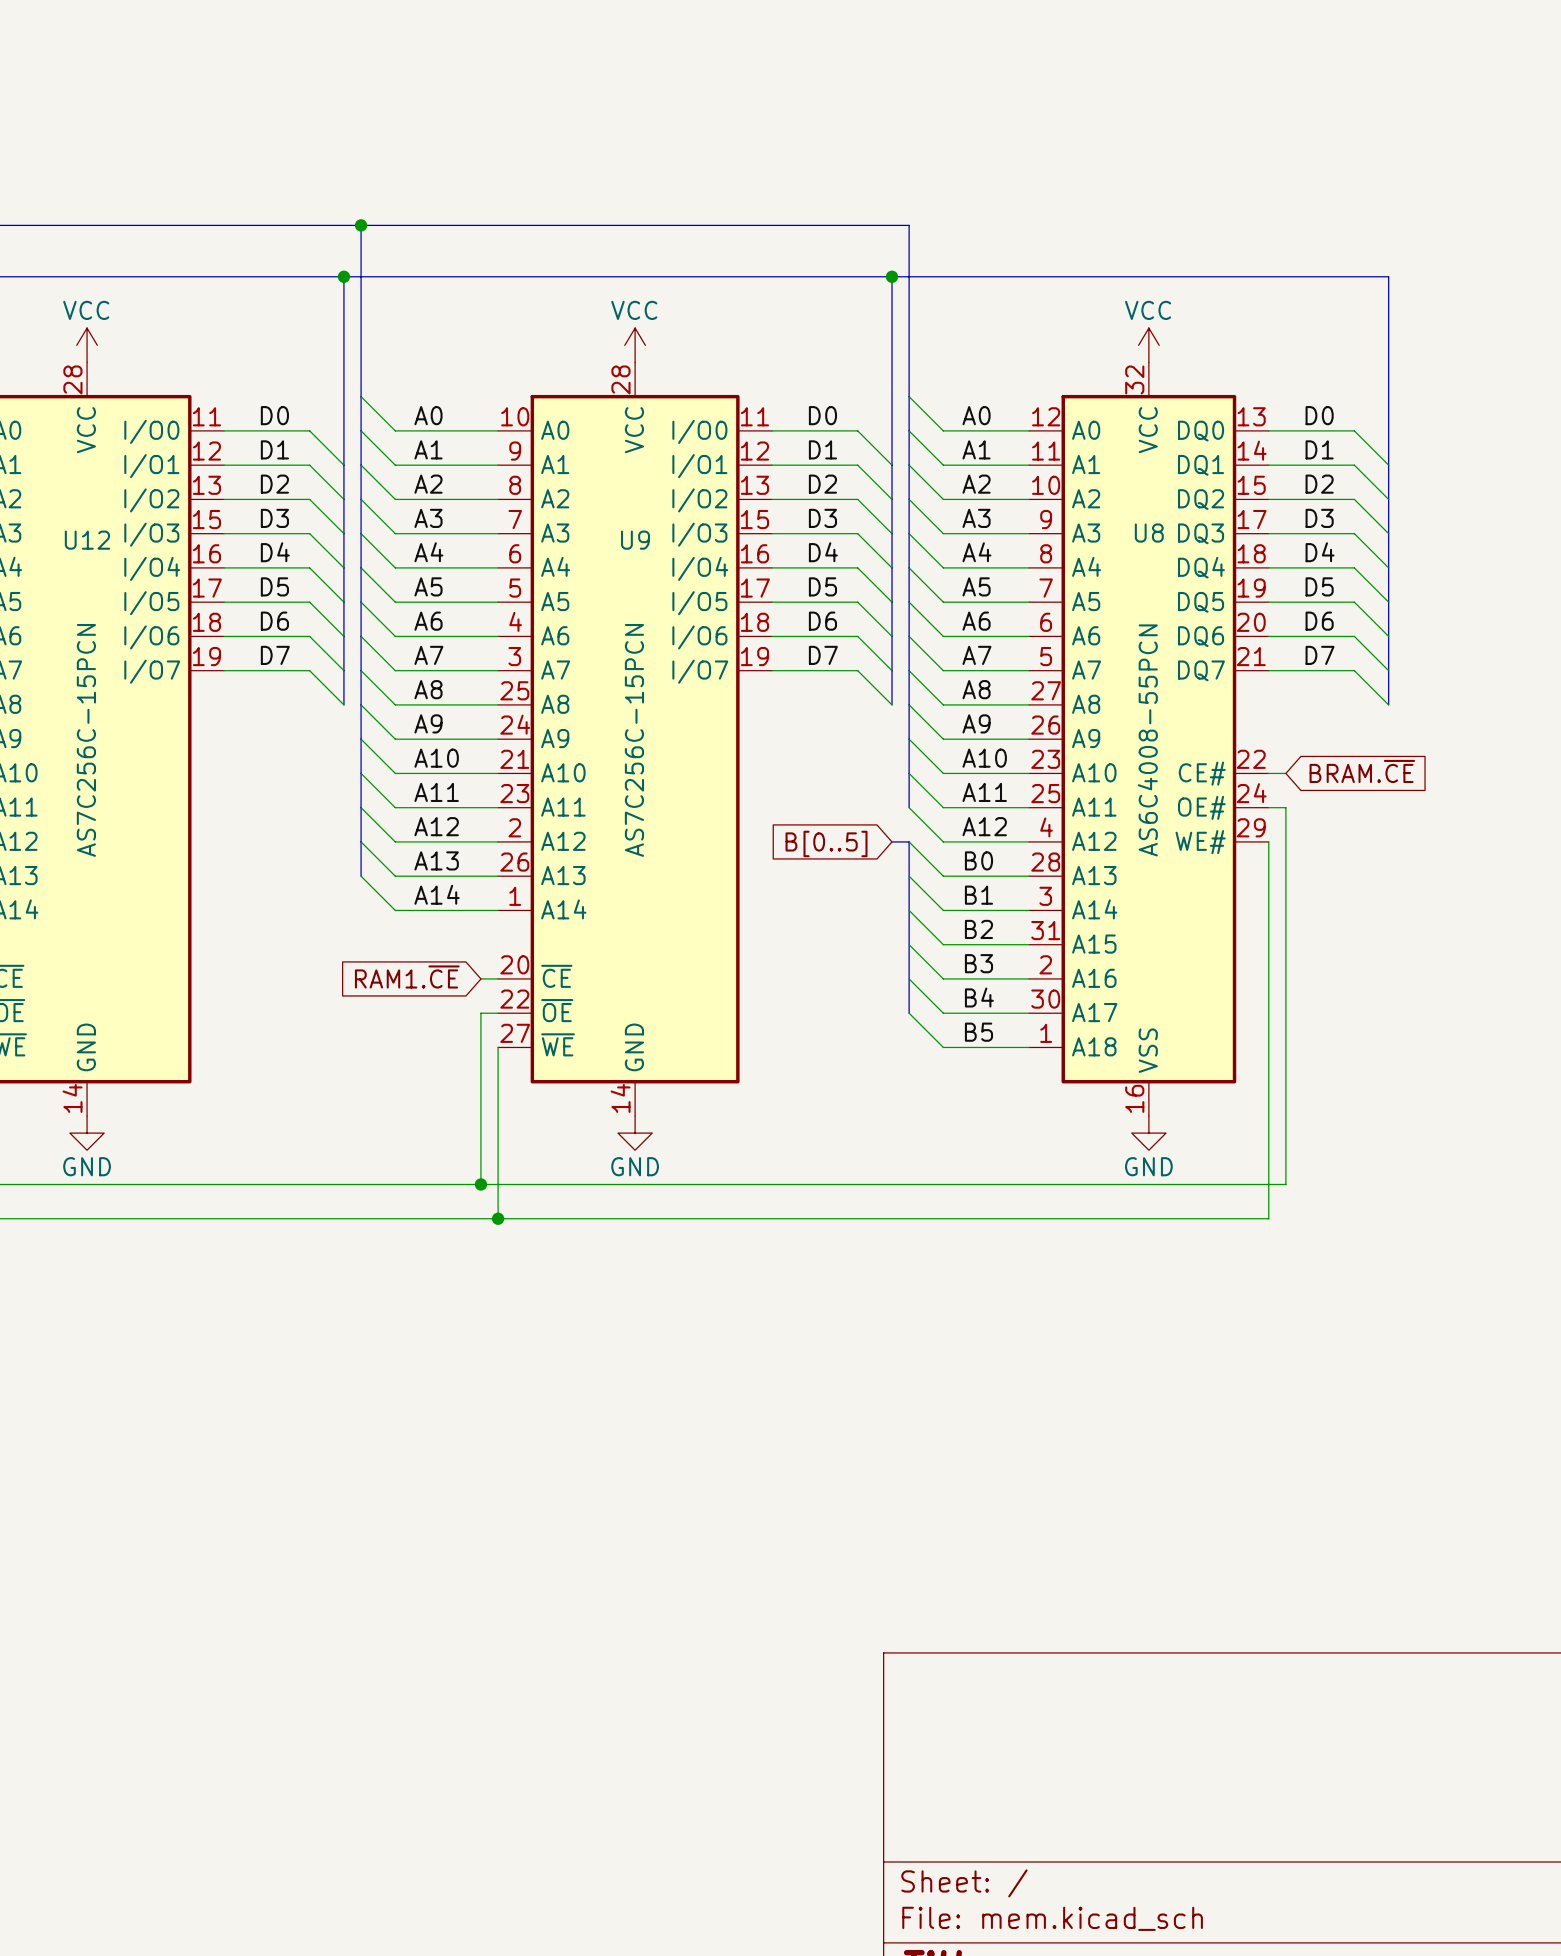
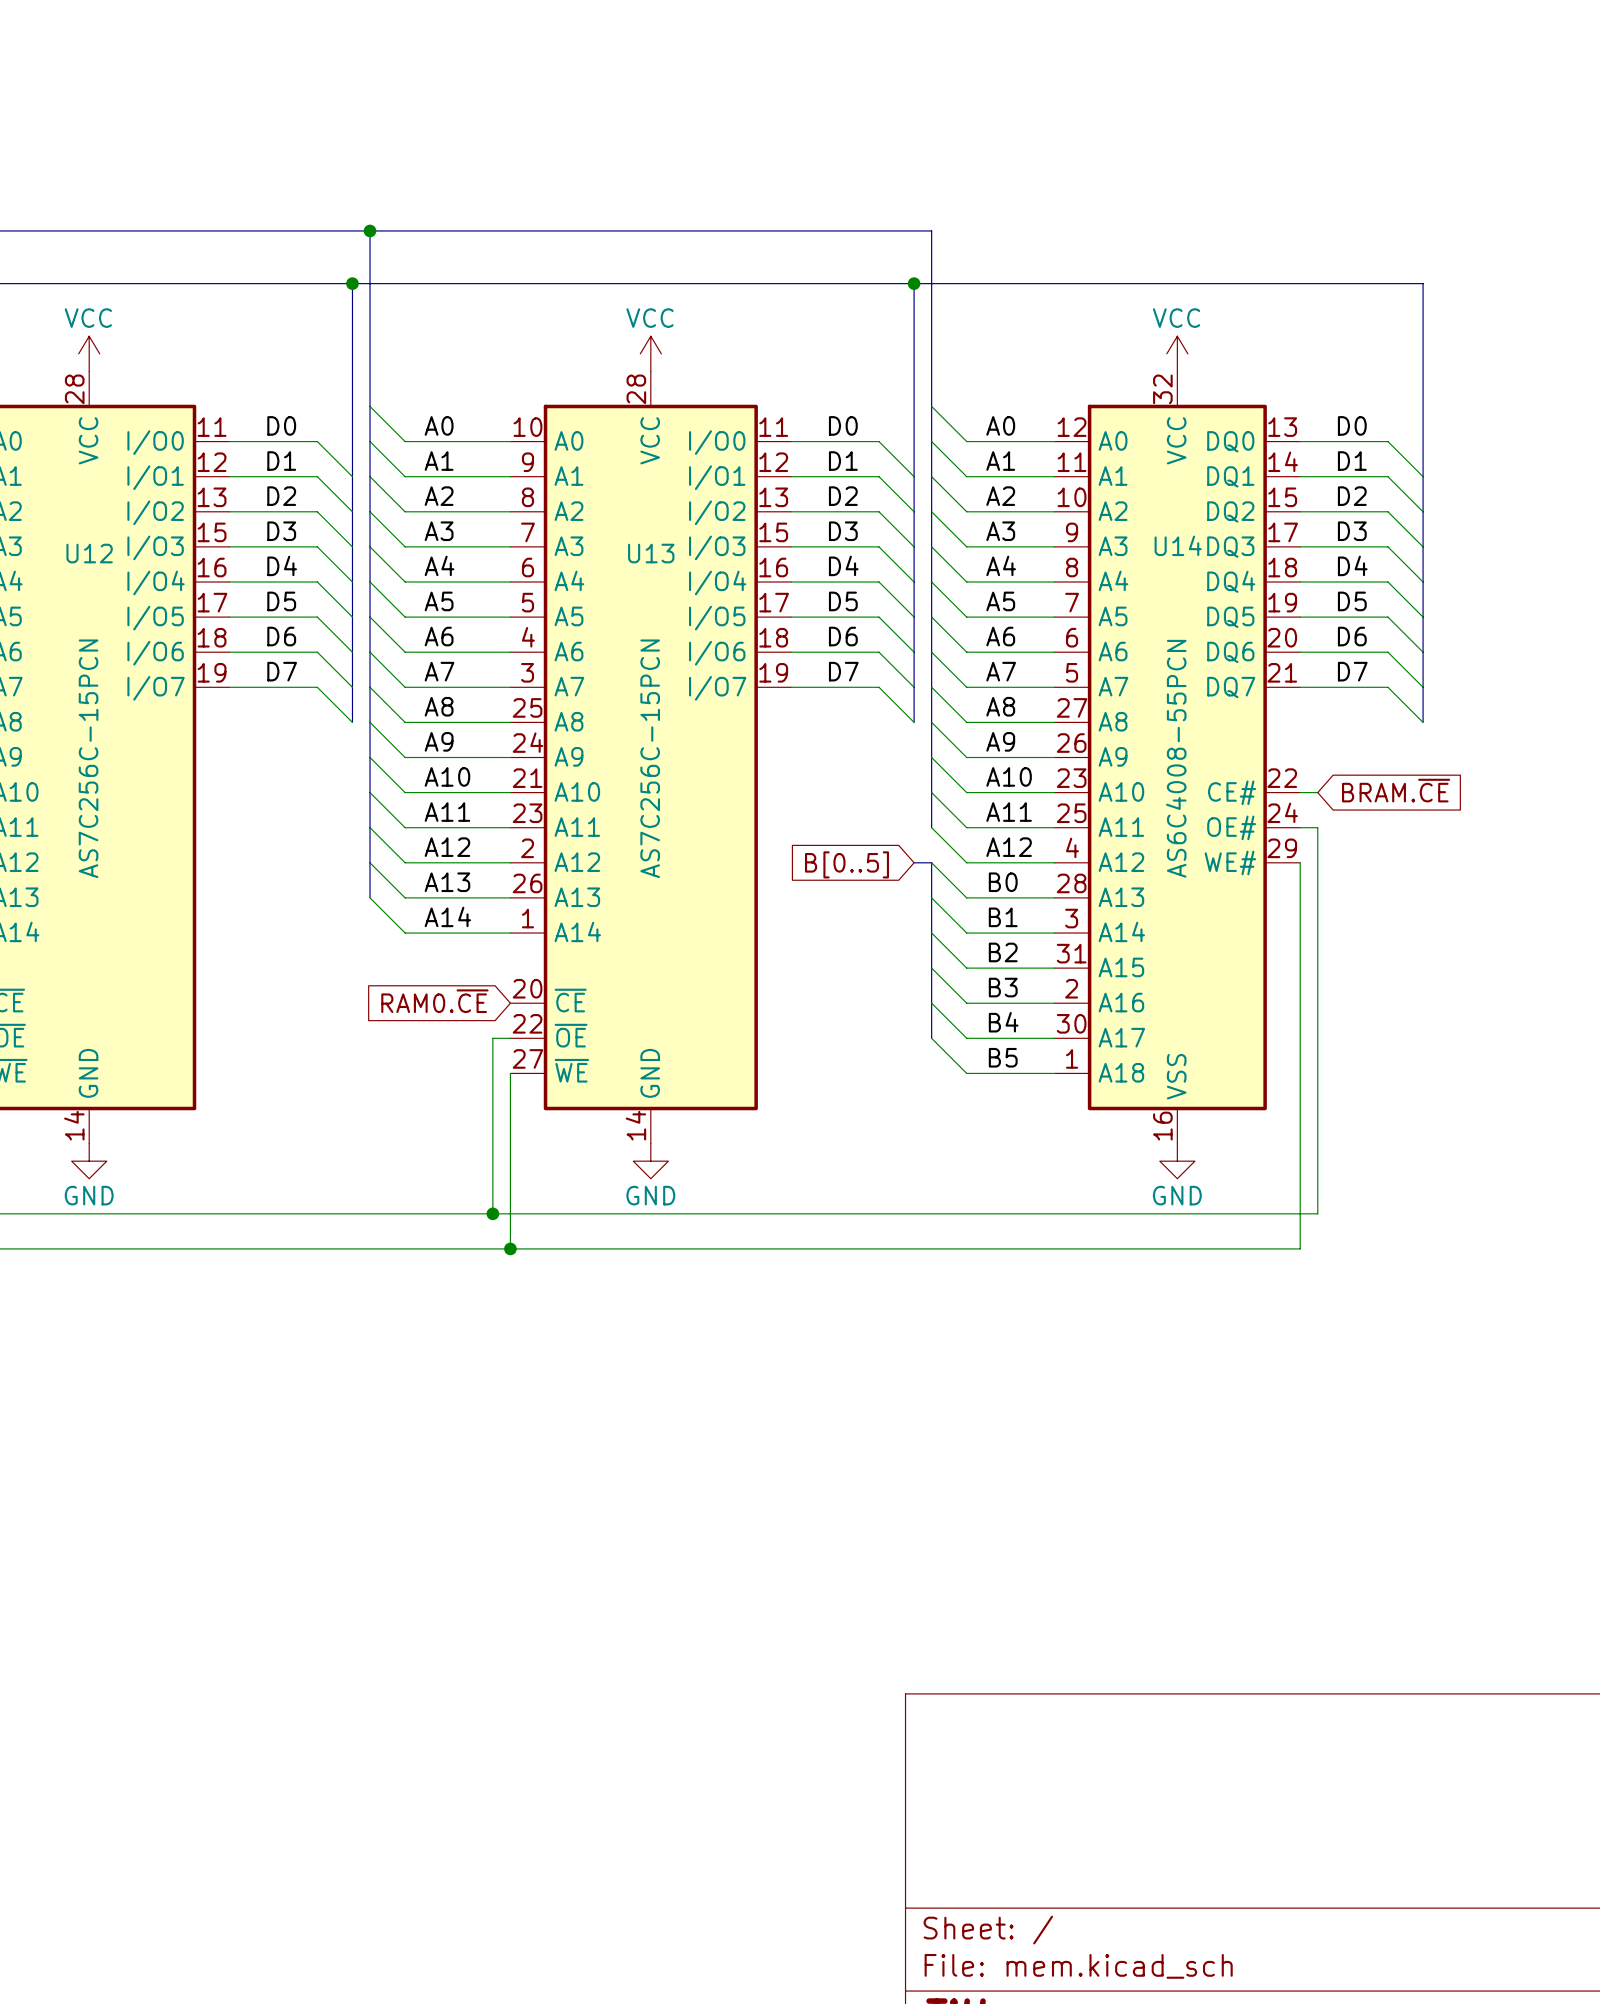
U8 name: U8 (1149, 533) -> U14 (1178, 545)
U9 name: U9 (635, 540) -> U13 (651, 553)
global label: RAM1.~{CE} (407, 976) -> RAM0.~{CE} (434, 1001)
wire: (480, 978) (498, 978) -> none

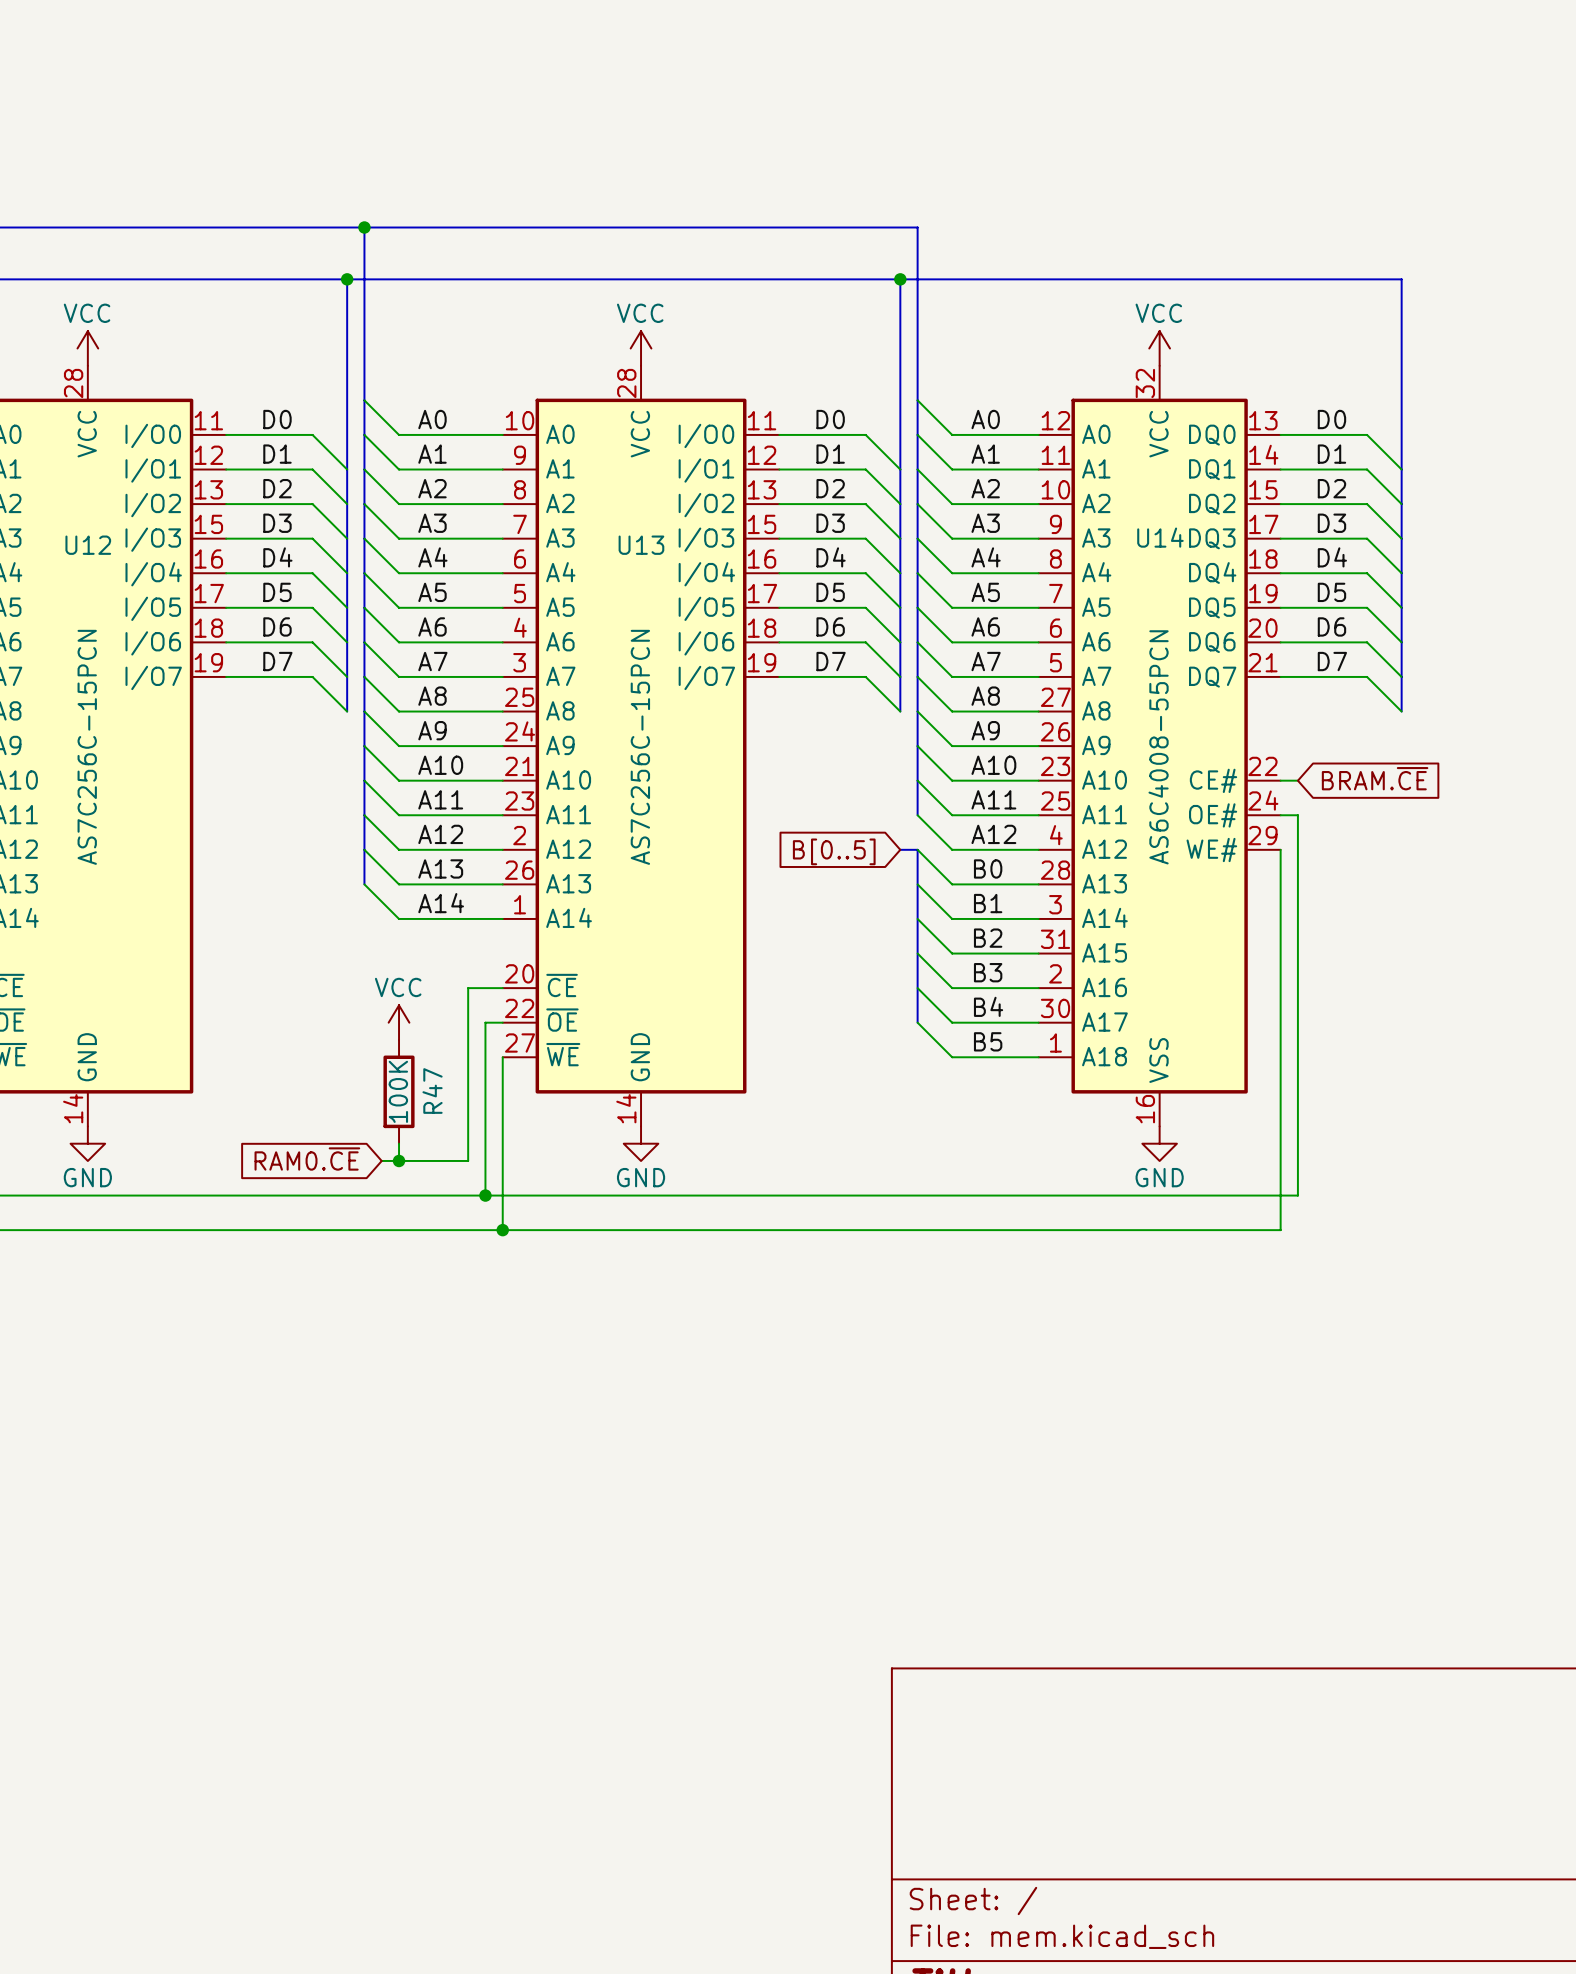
global label position: RAM0.~{CE} (434, 1001) -> RAM0.~{CE} (307, 1158)
wire: none -> (502, 988) (468, 988) (468, 1160) (381, 1160)
power symbol: none -> VCC (399, 1022)
R47: none -> 100K (399, 1091)
wire: none -> (399, 1143) (399, 1160)
junction: none -> (399, 1160)

